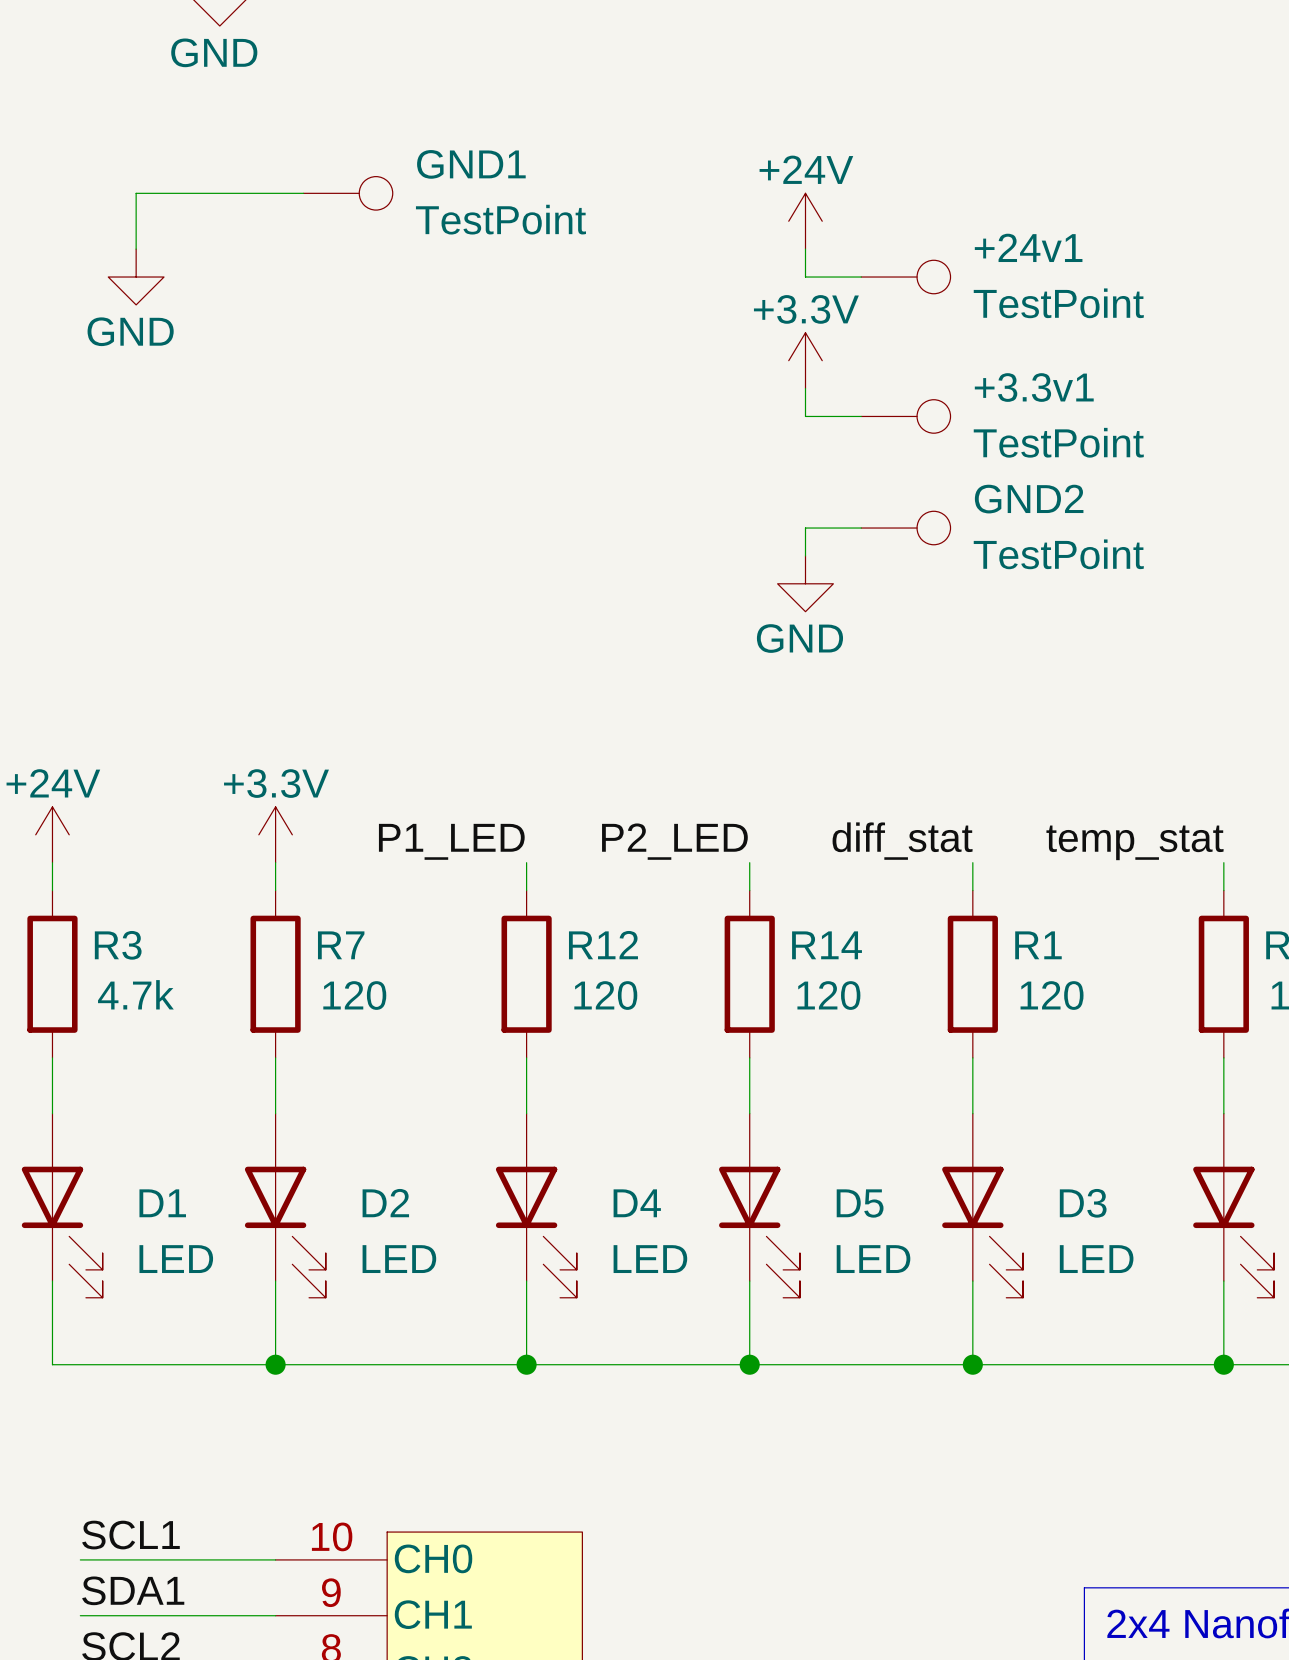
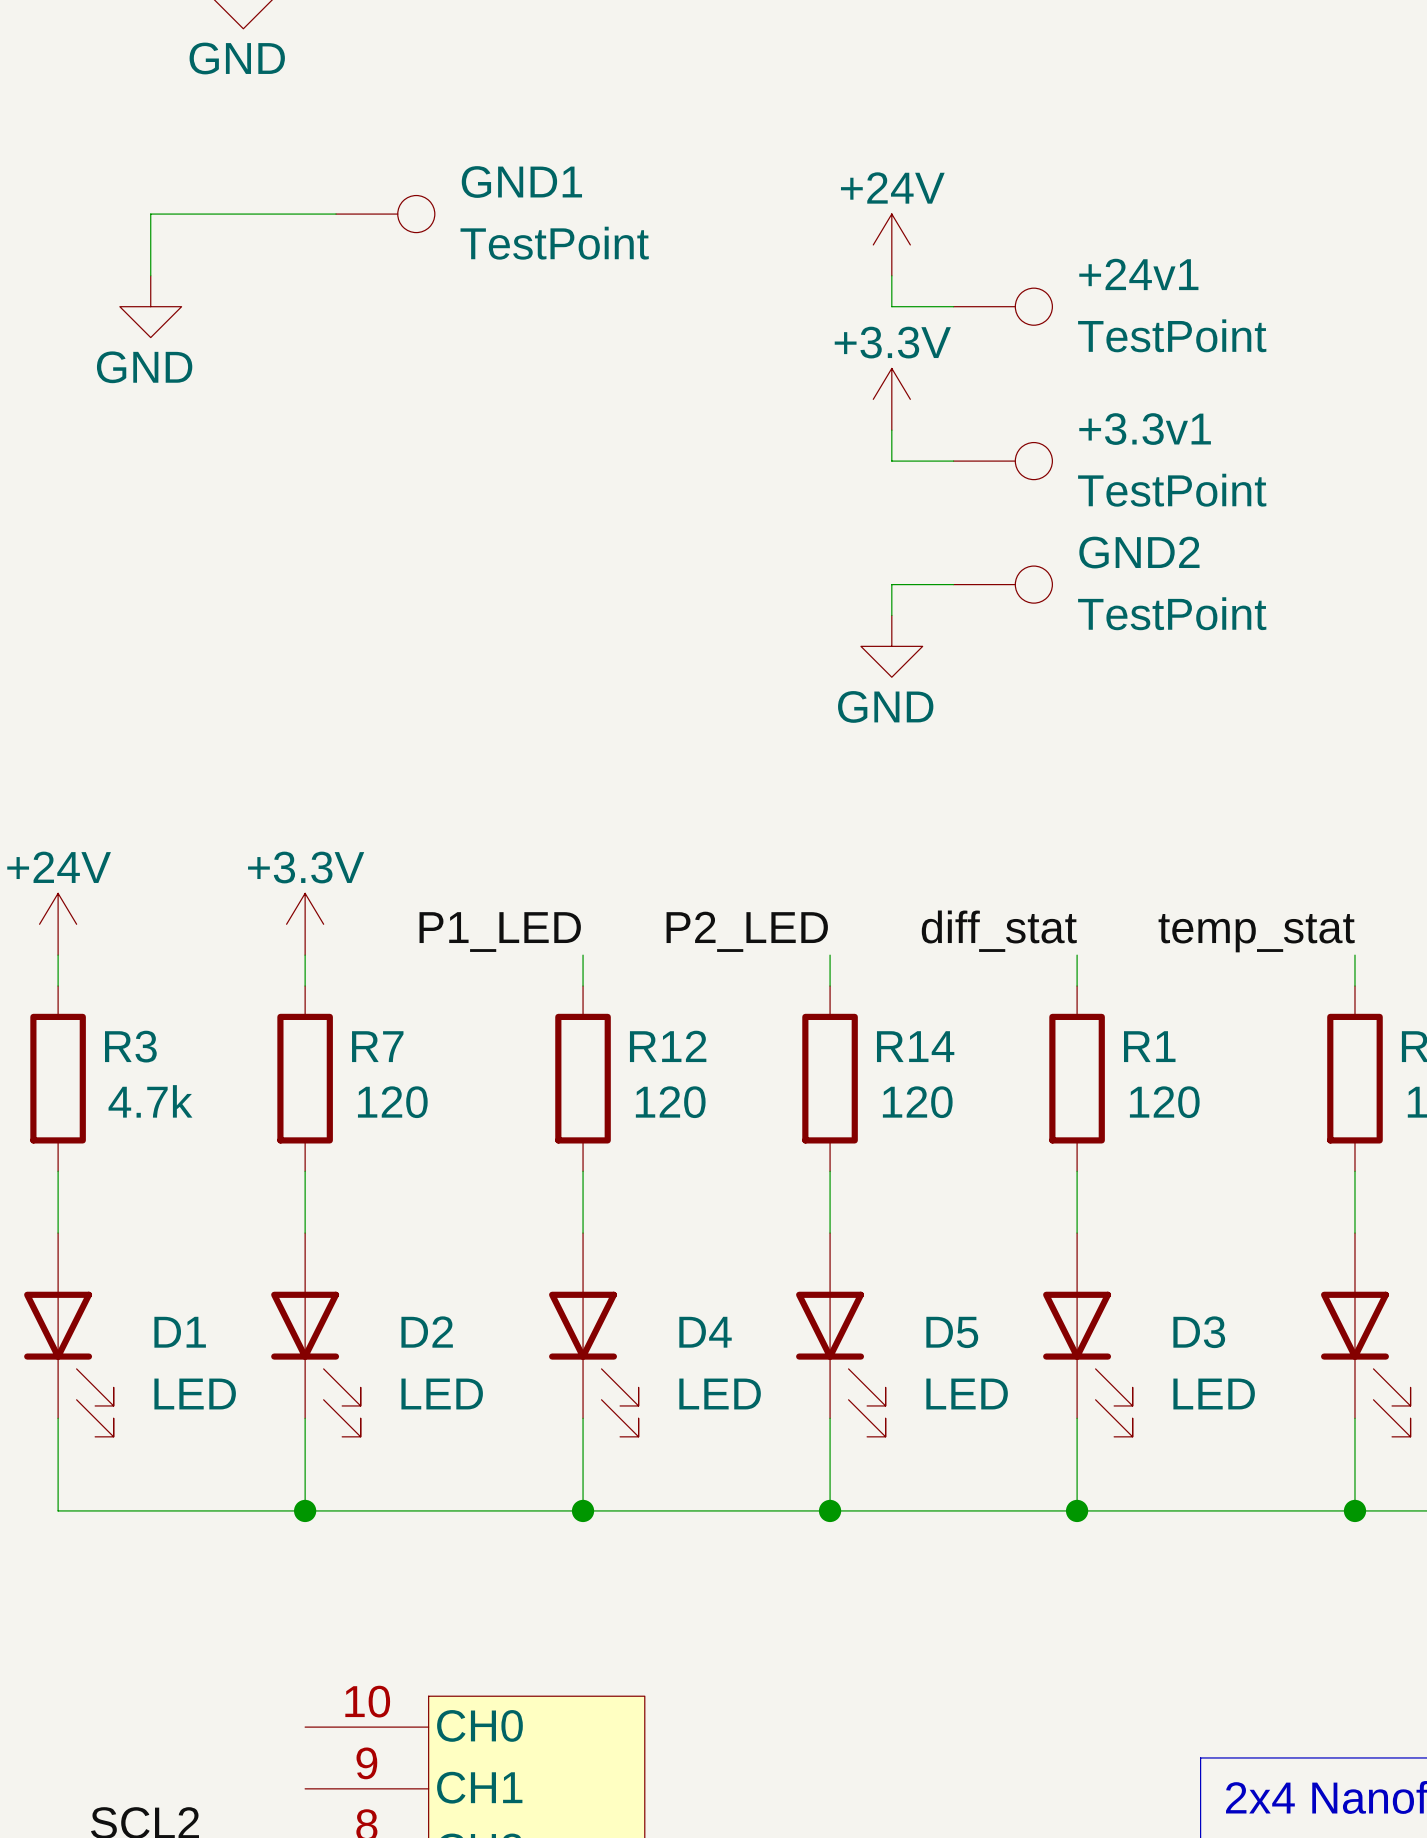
label: SCL1 (131, 1535) -> none
wire: (80, 1559) (275, 1559) -> none
label: SDA1 (133, 1590) -> none
wire: (80, 1615) (275, 1615) -> none

